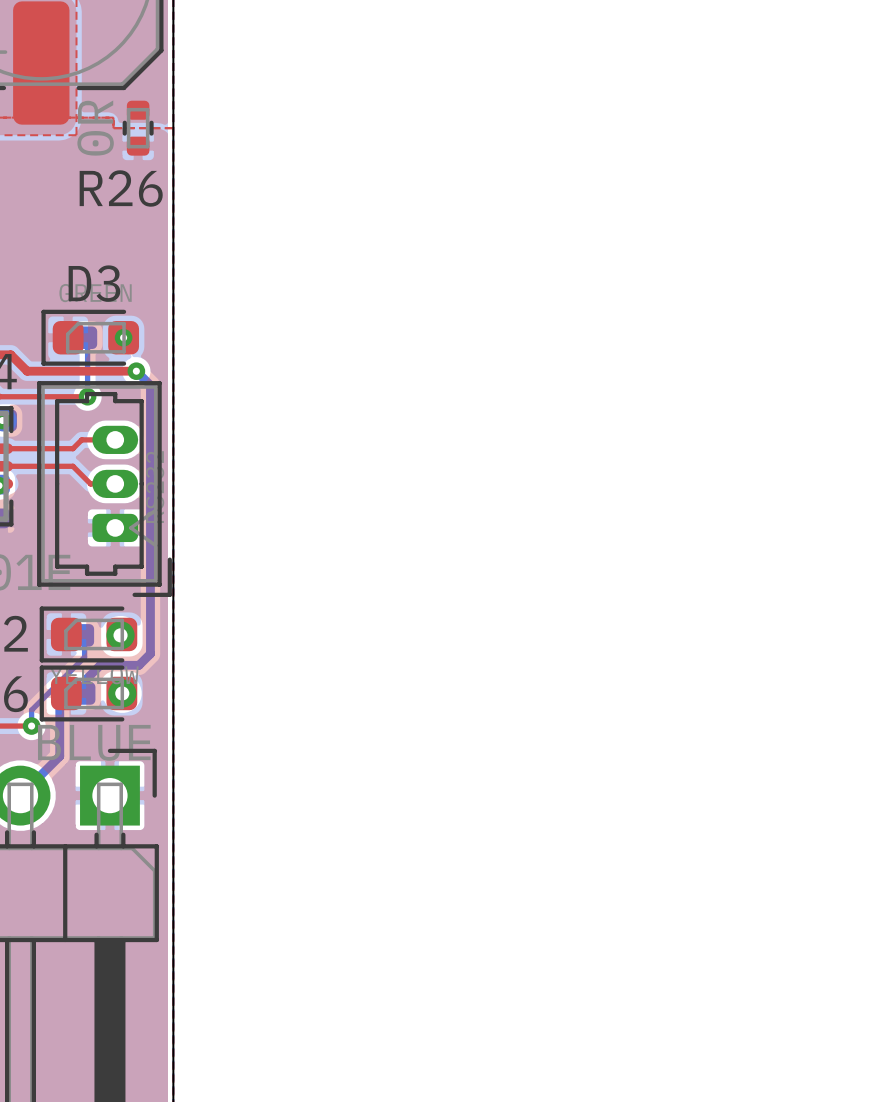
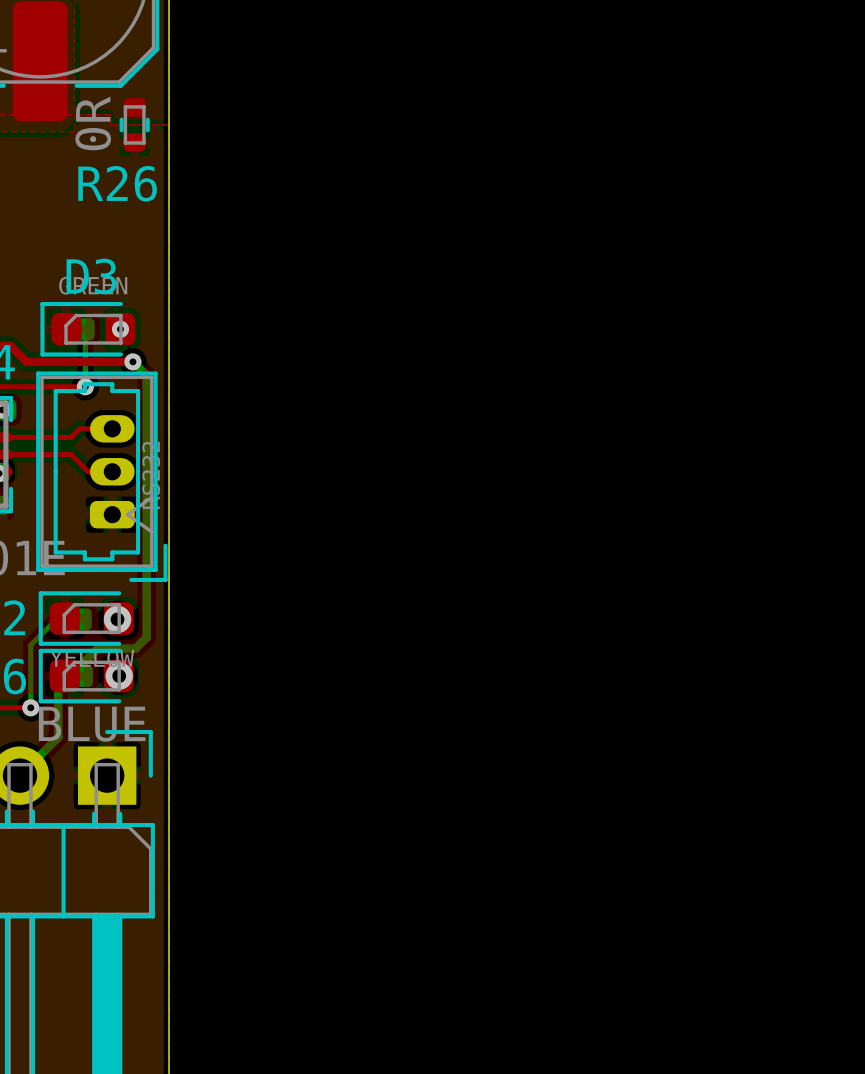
bottom track: (84, 635) (84, 657) (31, 710) -> (82, 619) (56, 619) (30, 645) (30, 692)

